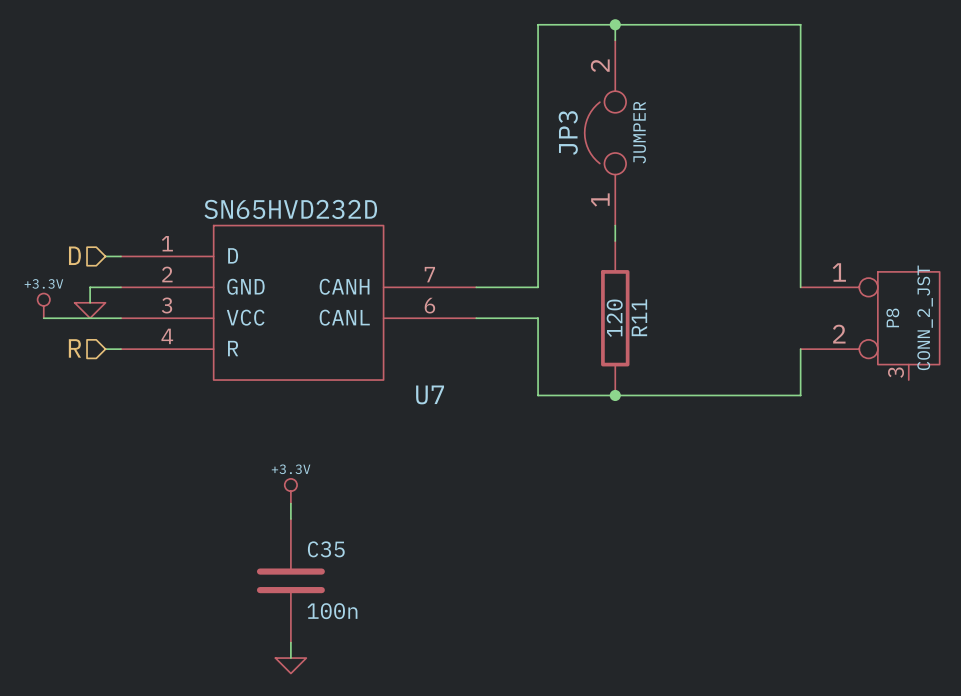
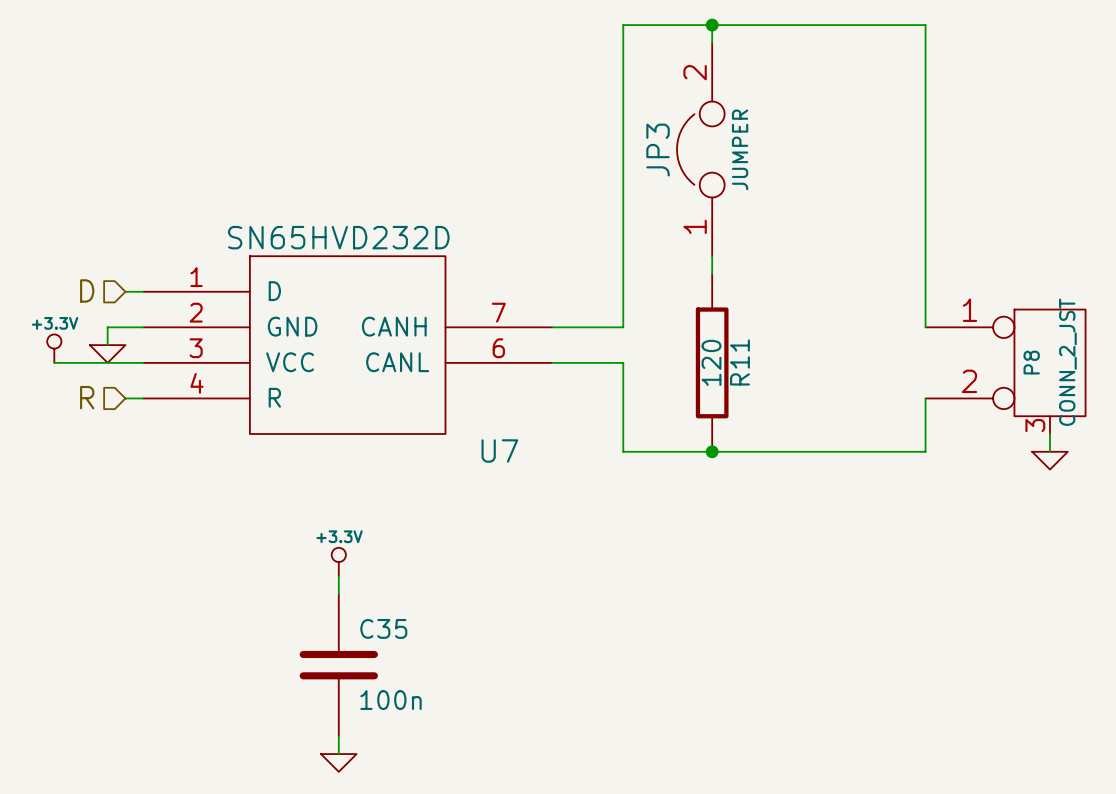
wire: none -> (1050, 434) (1050, 451)
power symbol: none -> (1050, 460)

